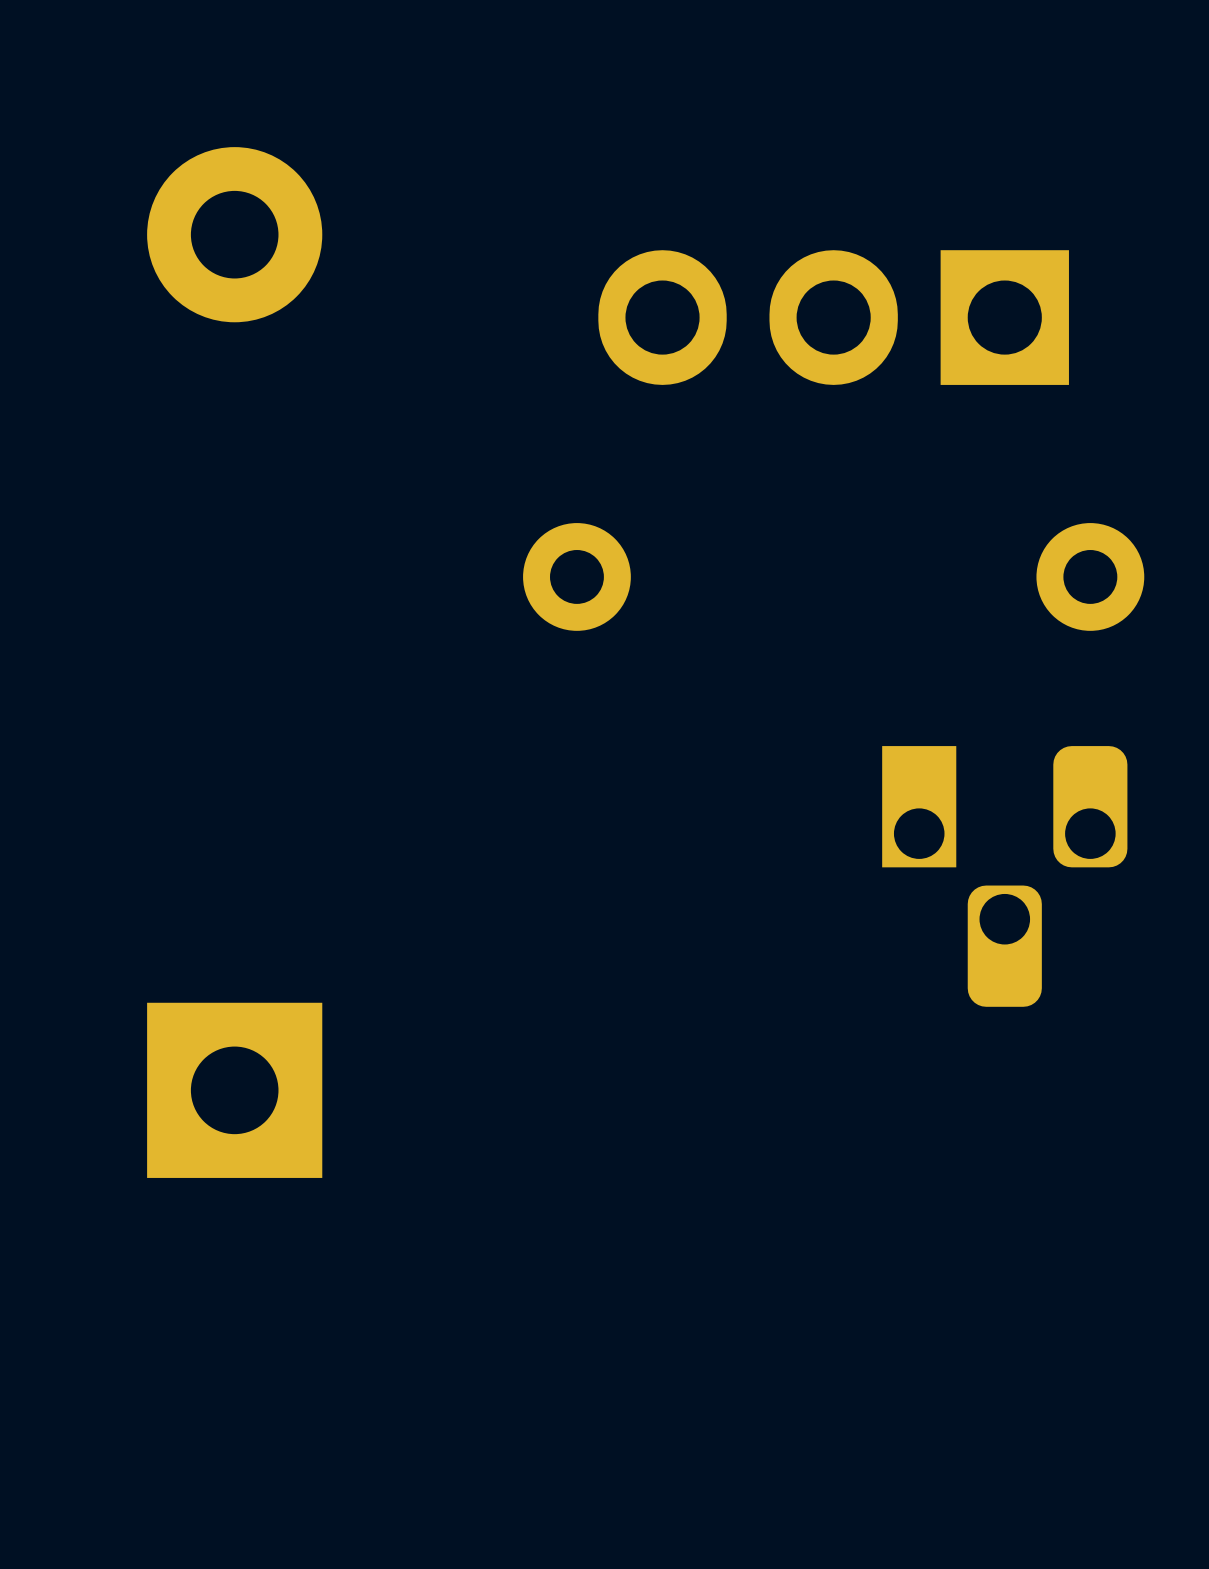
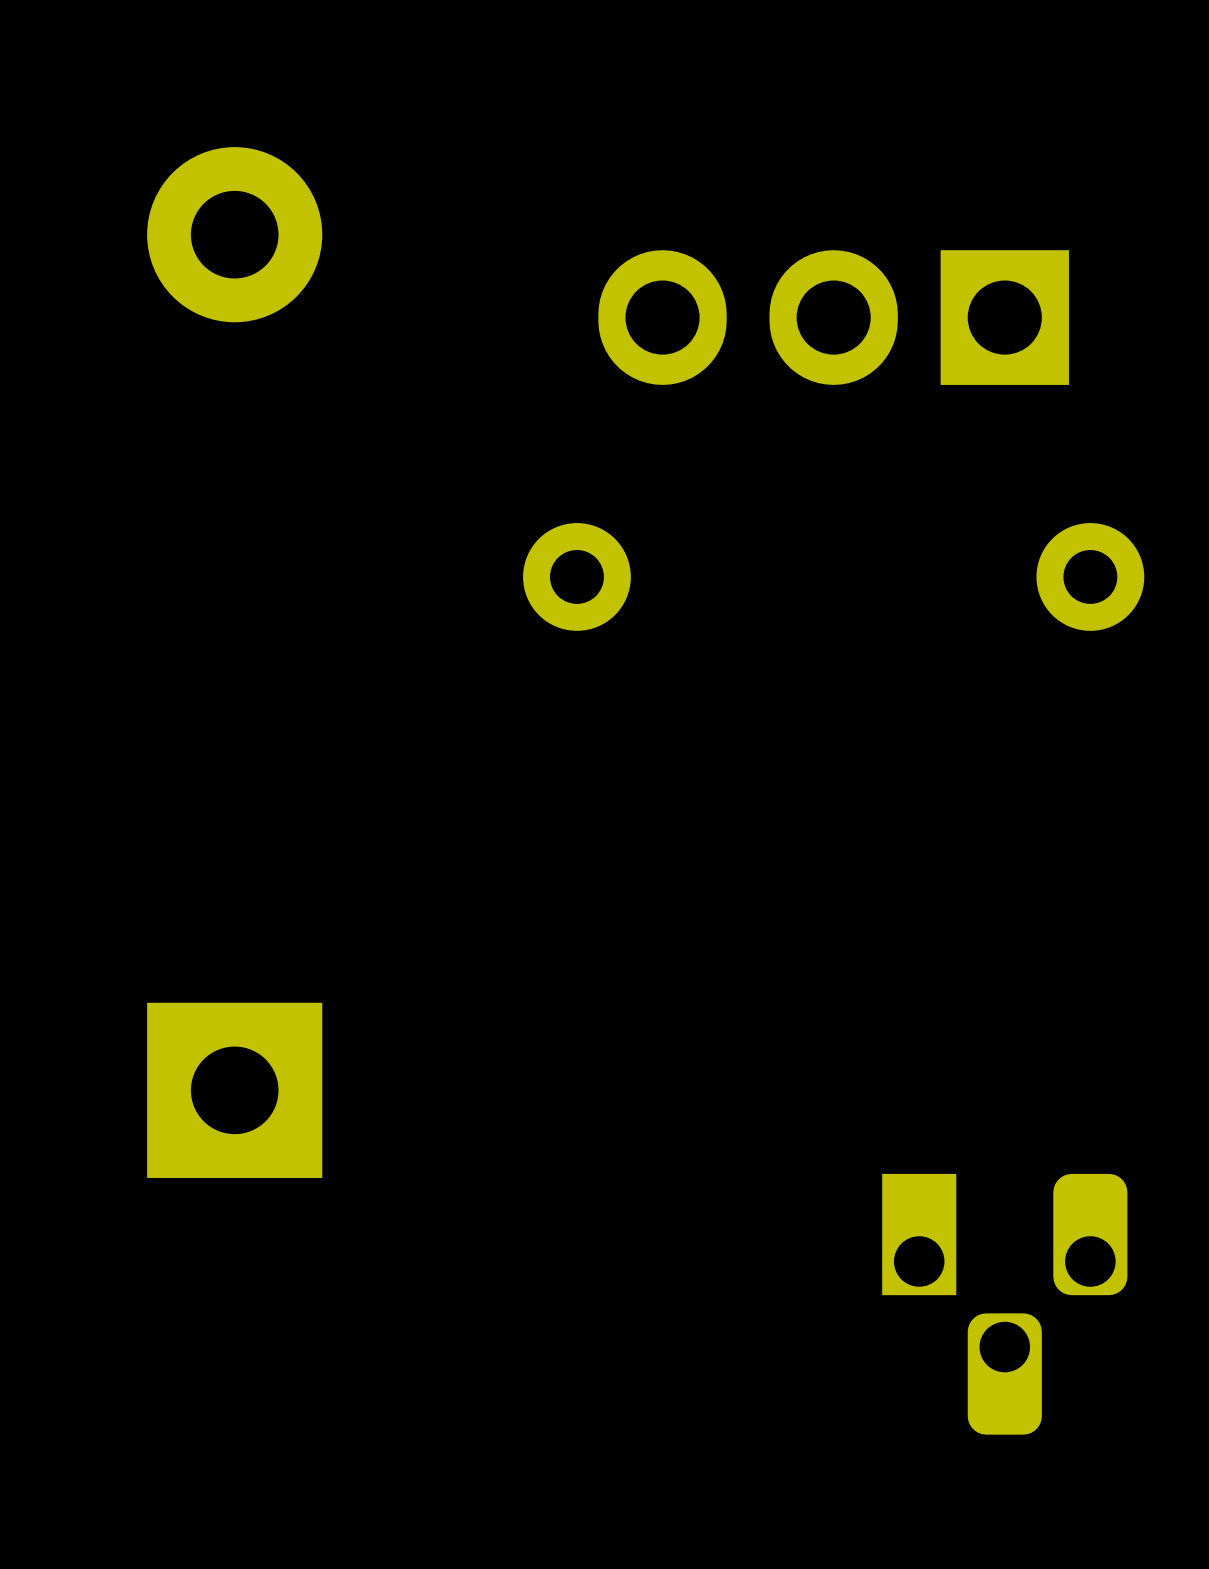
part position: (1004, 876) -> (1004, 1304)

